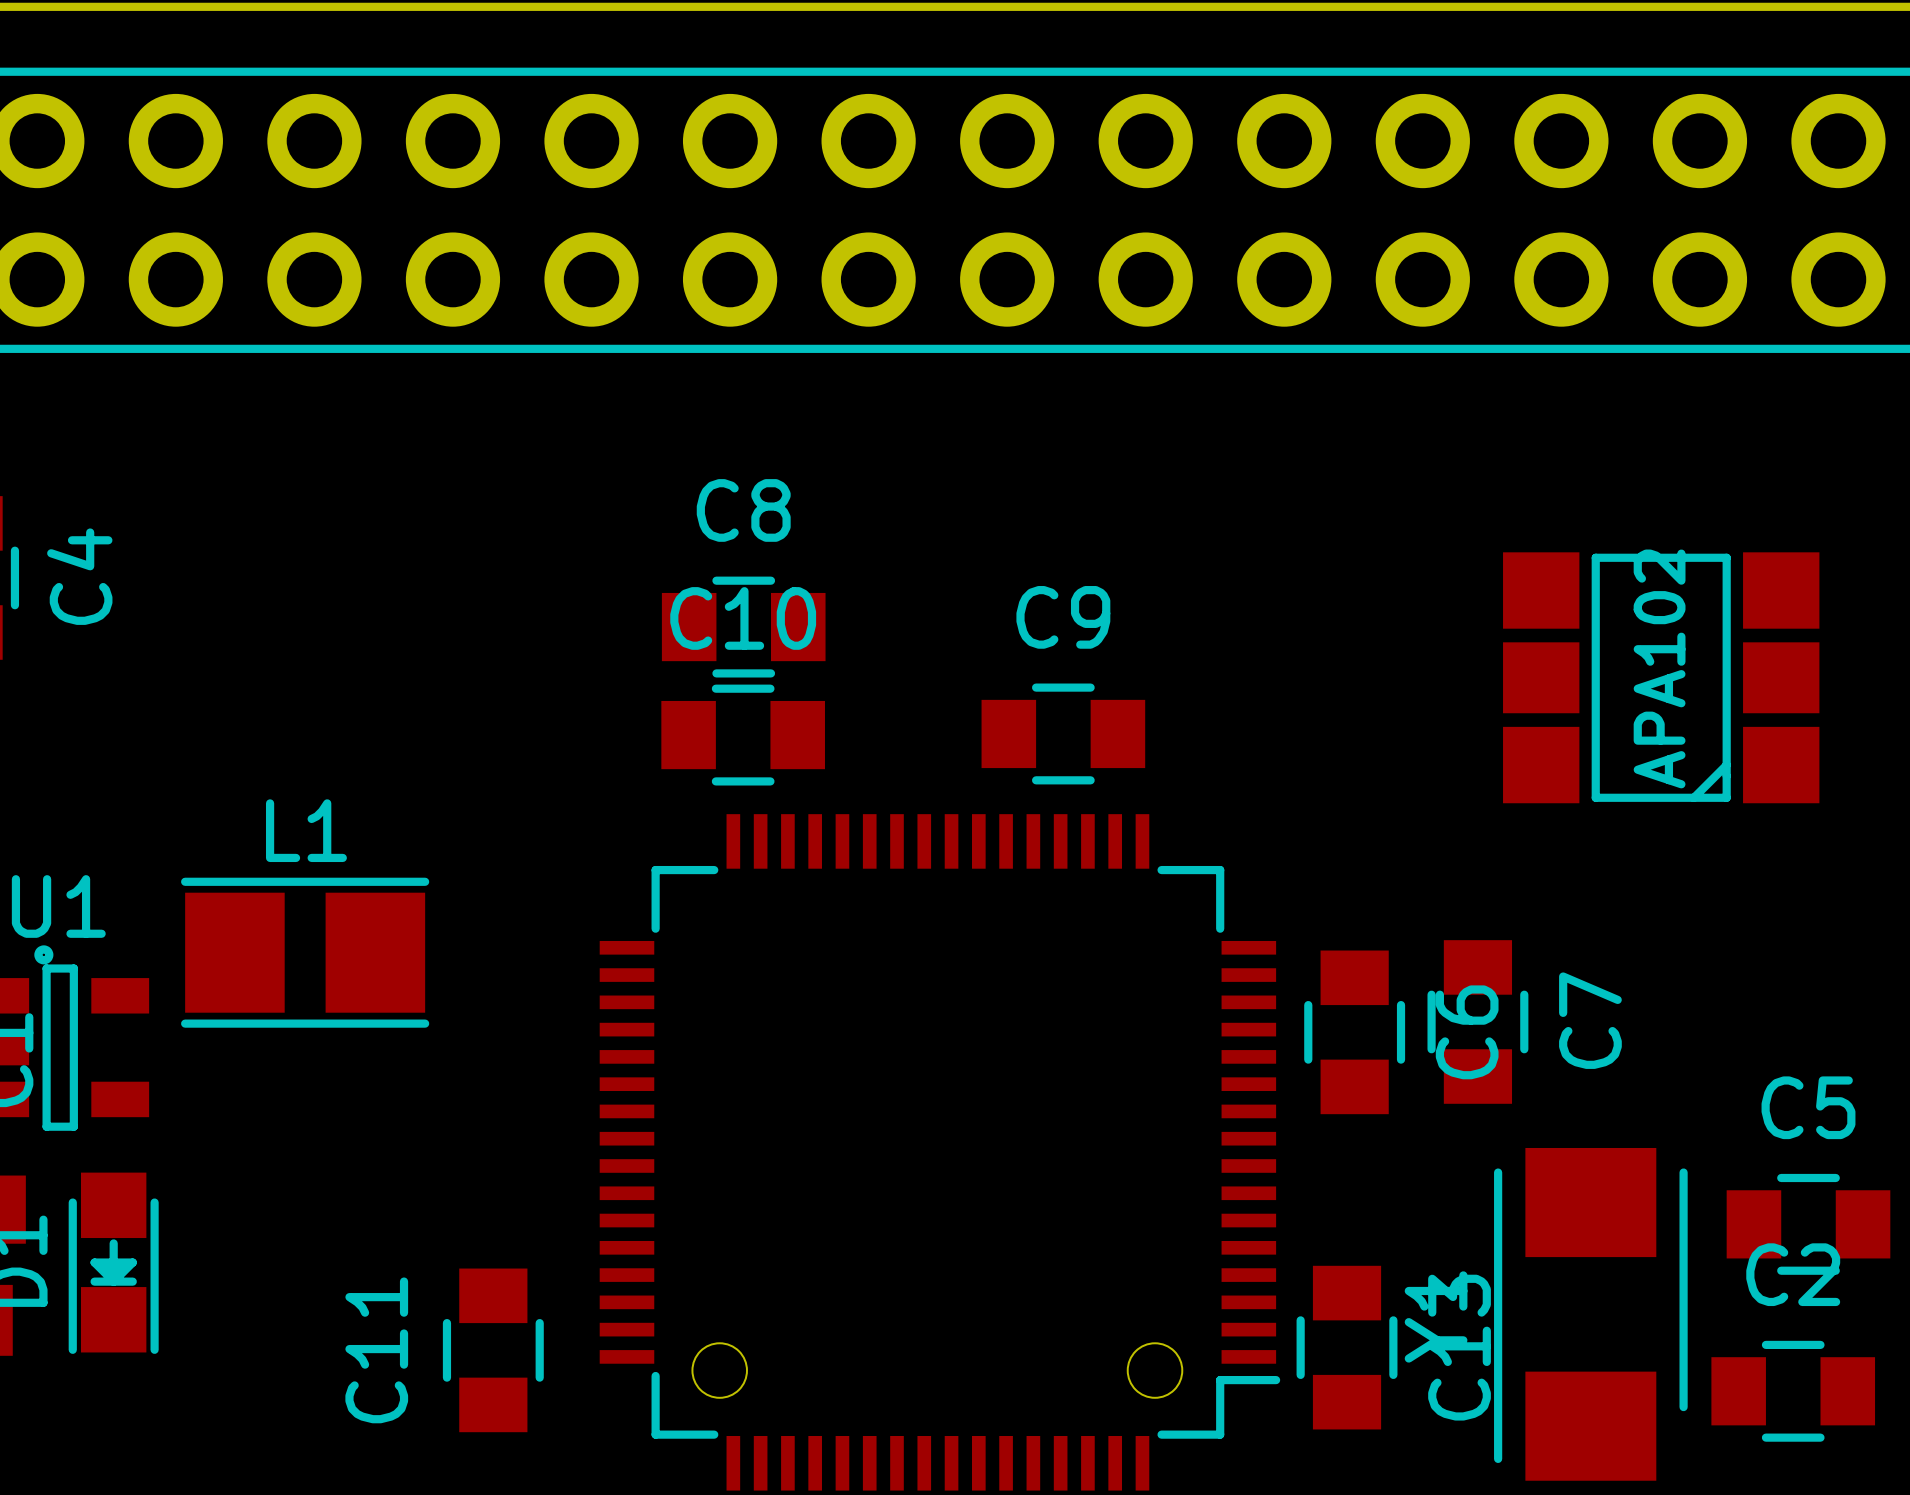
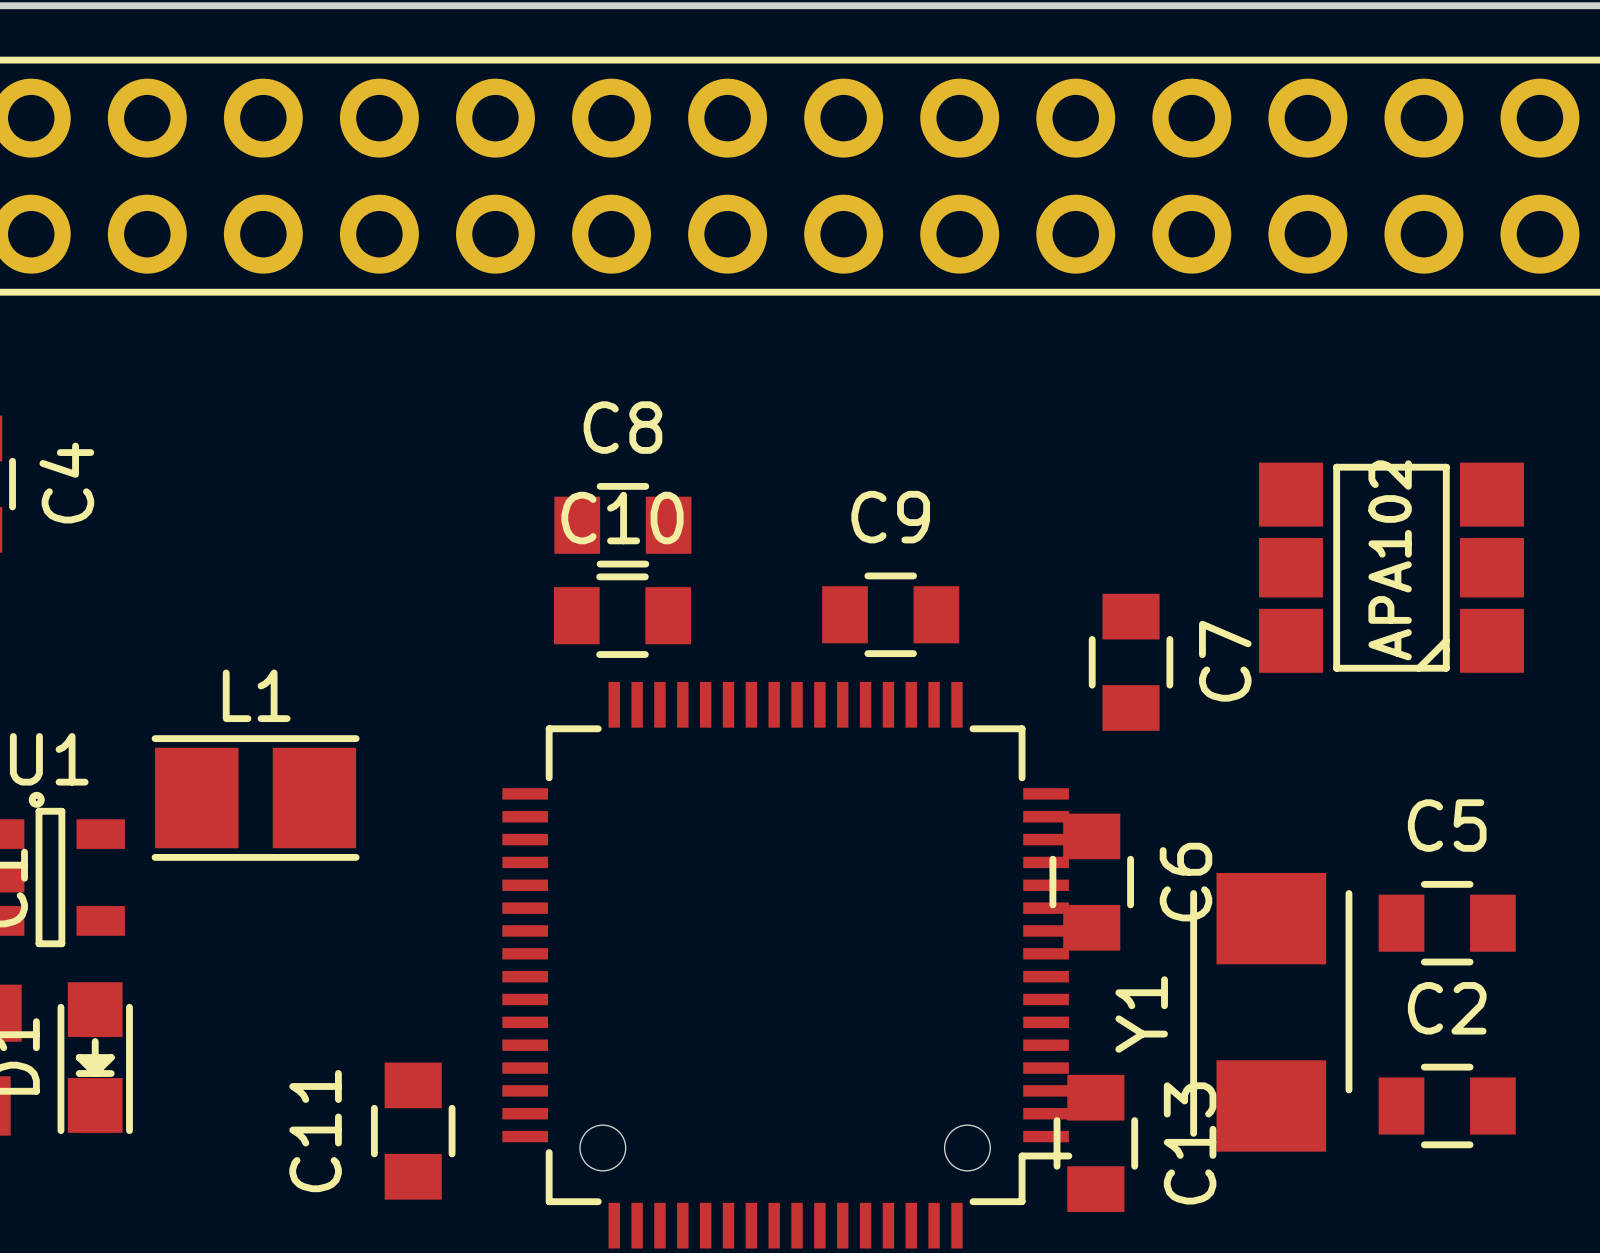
C7 position: (1477, 1021) -> (1131, 662)
C6 position: (1354, 1032) -> (1091, 882)
C5 position: (1808, 1224) -> (1447, 923)
Y1 position: (1590, 1314) -> (1271, 1012)
C13 position: (1347, 1347) -> (1095, 1143)
C2 position: (1793, 1391) -> (1447, 1105)

